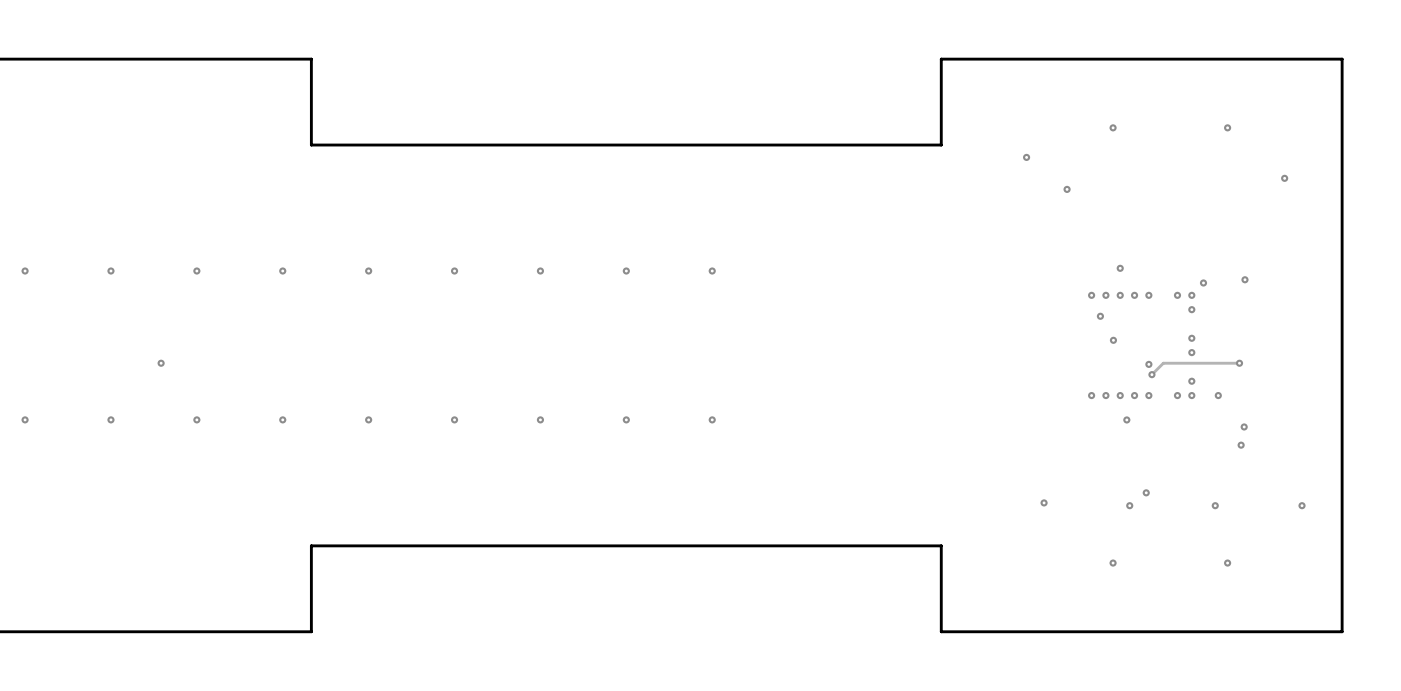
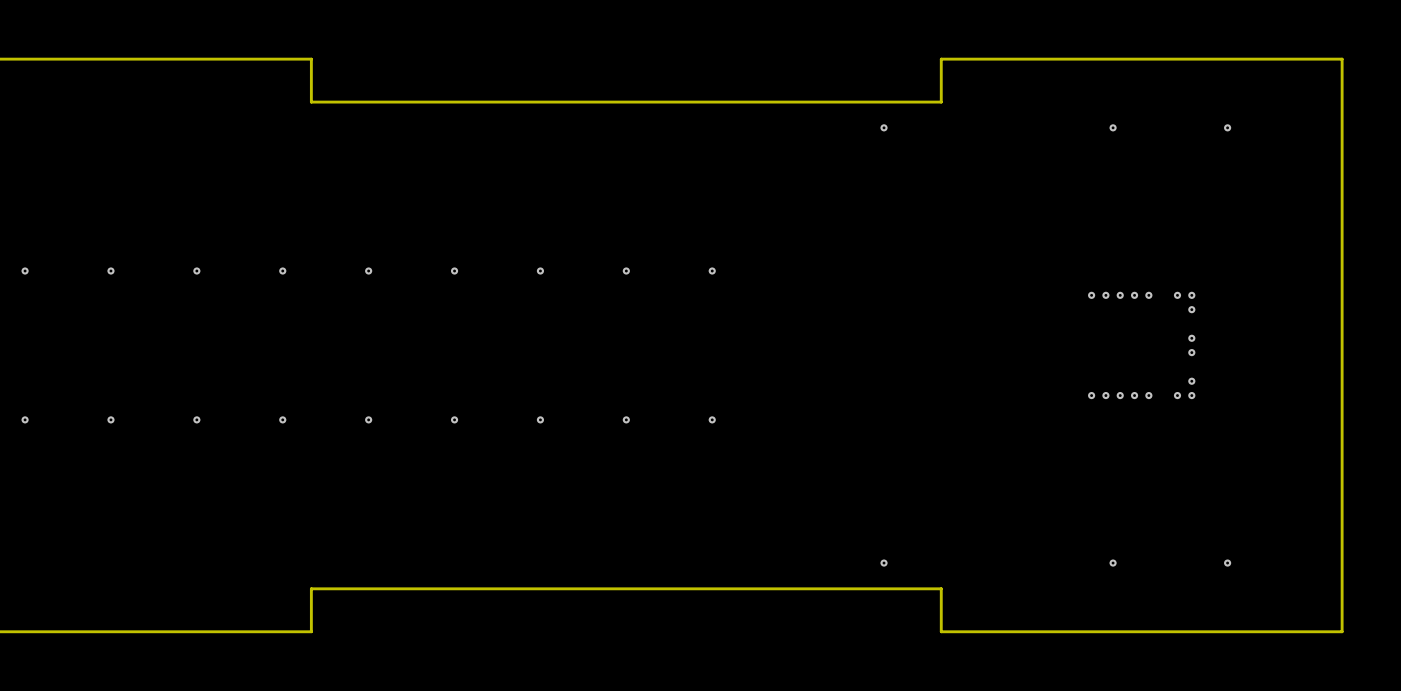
board edge: (941, 102) (941, 145) (311, 145) (311, 102) -> (941, 102) (311, 102)
via: none -> (884, 127)
via: (1026, 157) -> none
via: (1284, 178) -> none
via: (1067, 189) -> none
via: (1120, 268) -> none
via: (1244, 279) -> none
via: (1203, 282) -> none
via: (1100, 316) -> none
via: (1113, 340) -> none
via: (161, 363) -> none
track: (1239, 363) (1163, 363) (1151, 374) -> none
via: (1239, 363) -> none
via: (1148, 364) -> none
via: (1151, 374) -> none
via: (1218, 395) -> none
via: (1126, 419) -> none
via: (1244, 426) -> none
via: (1241, 445) -> none
via: (1146, 492) -> none
via: (1044, 502) -> none
via: (1129, 505) -> none
via: (1215, 505) -> none
via: (1302, 505) -> none
via: none -> (884, 563)
board edge: (941, 588) (941, 545) (311, 545) (311, 588) -> (941, 588) (311, 588)

